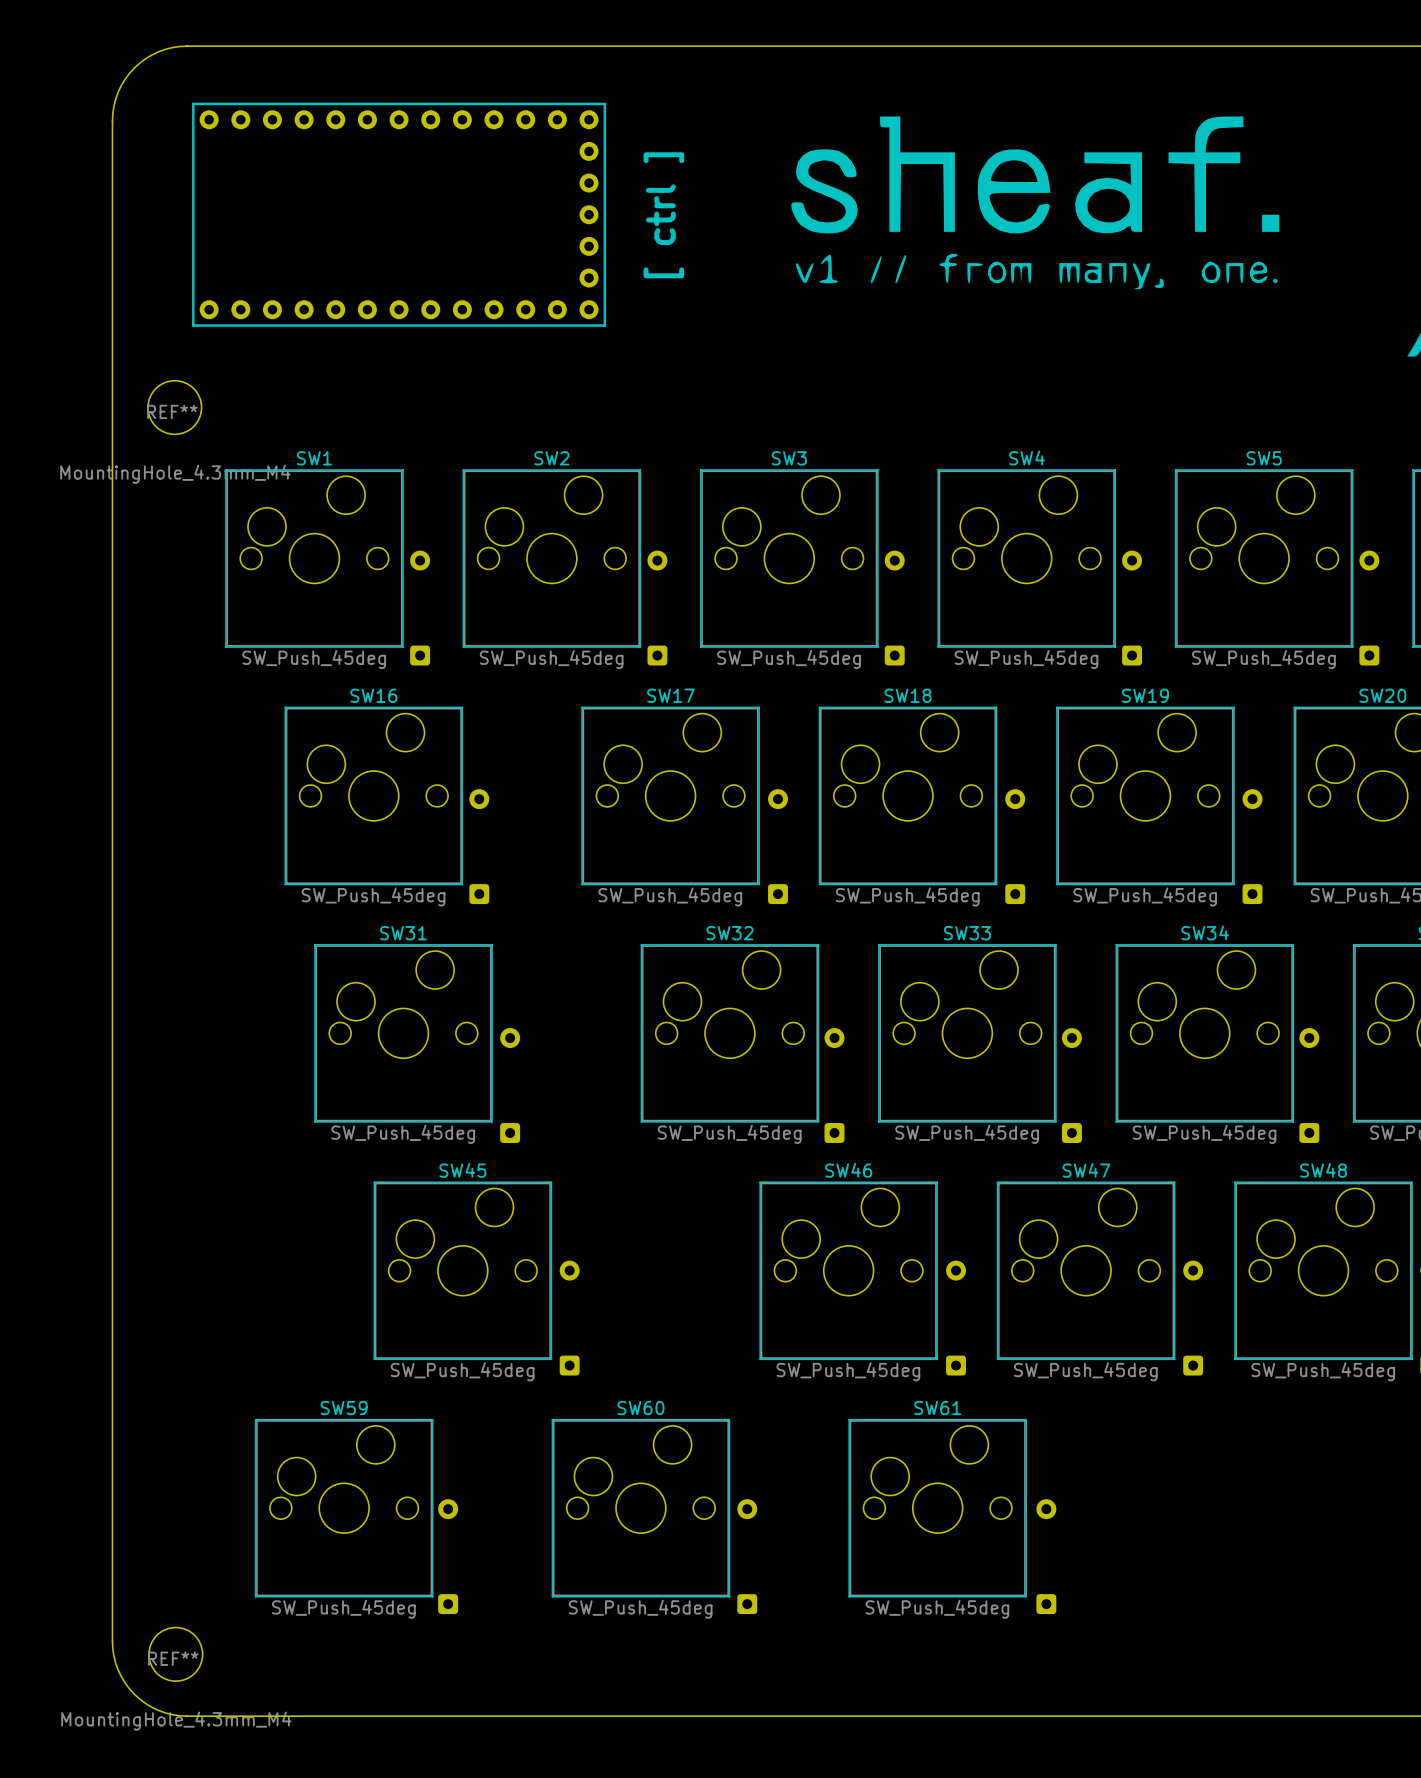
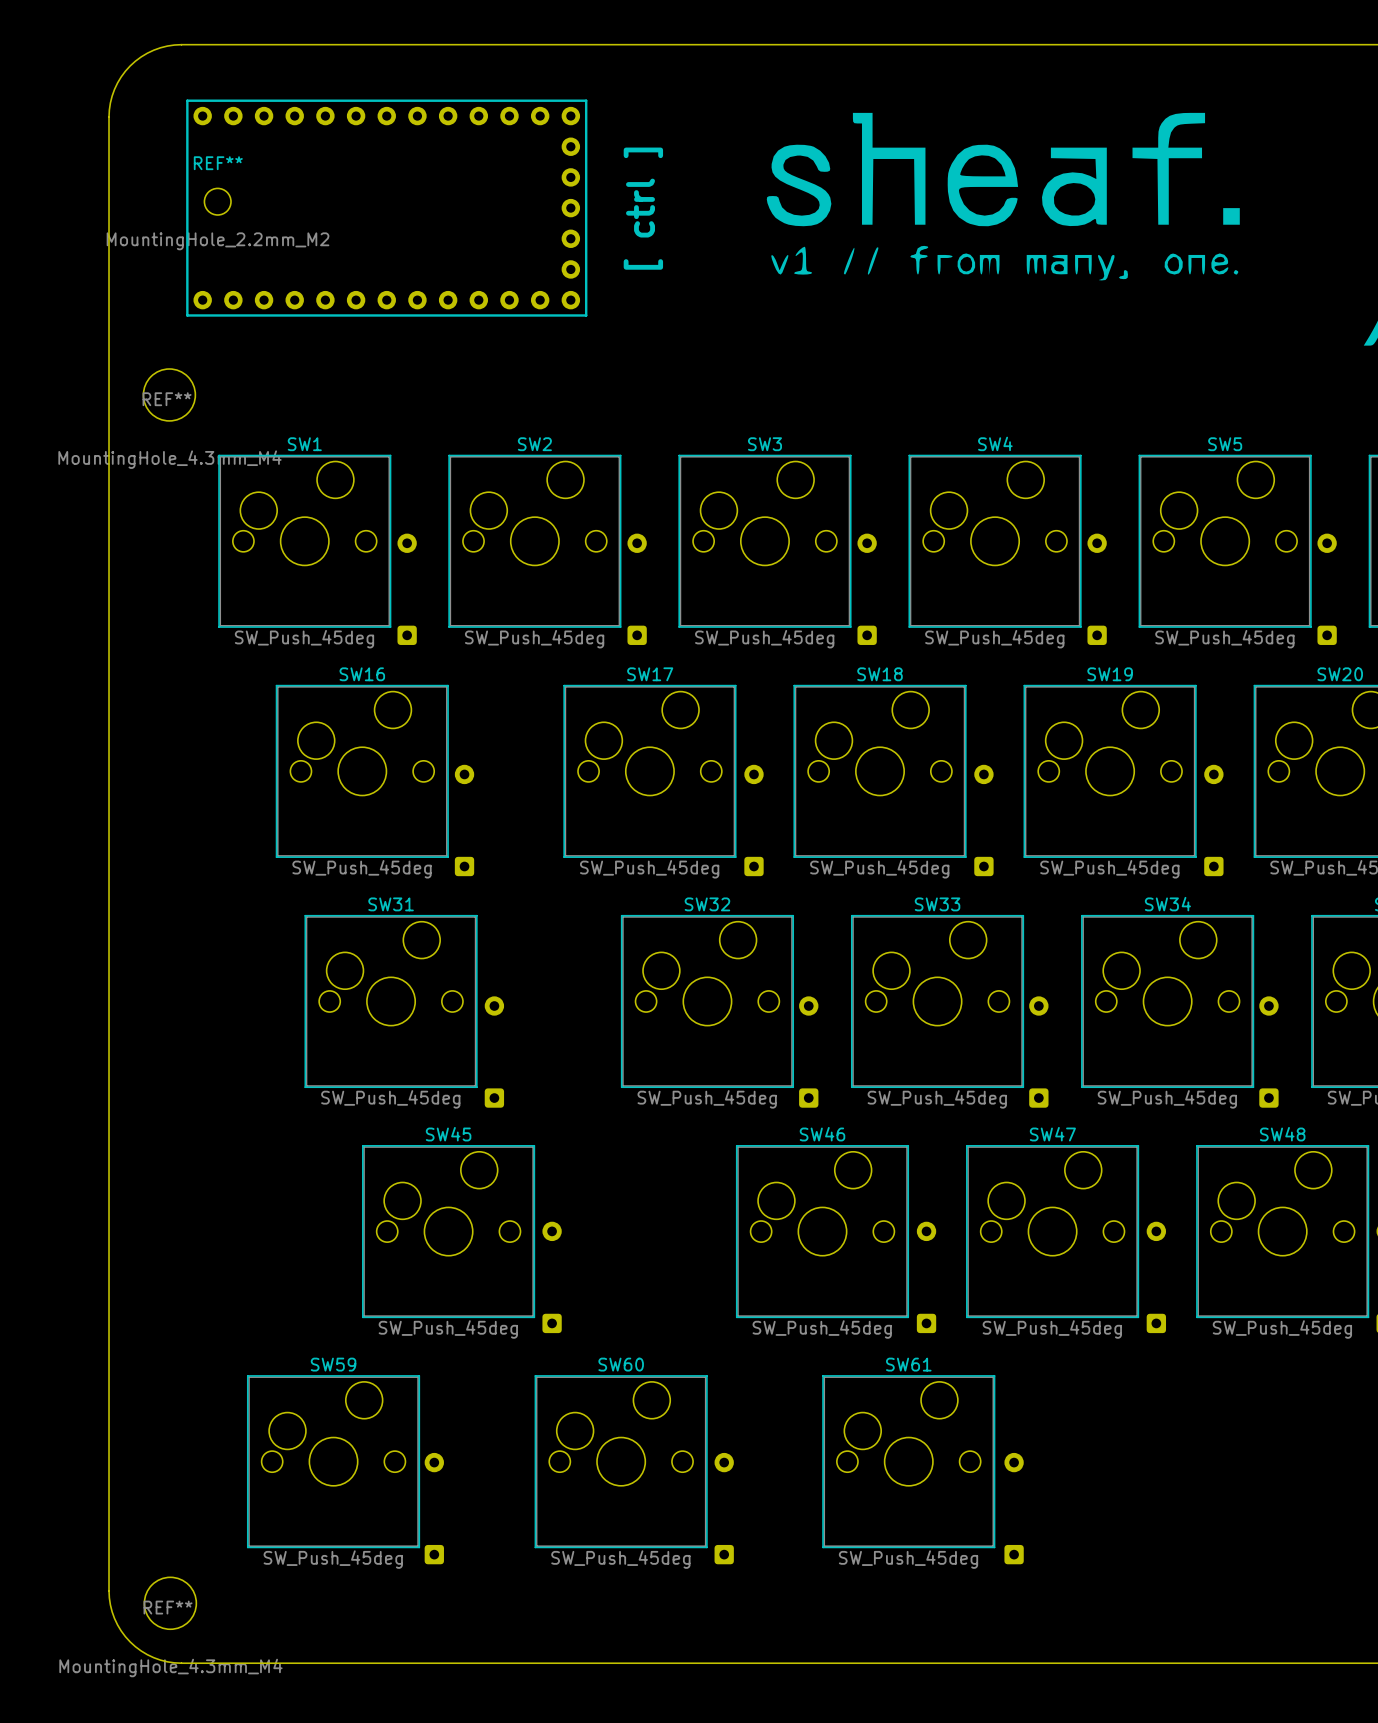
REF**: none -> MountingHole_2.2mm_M2 (217, 201)

